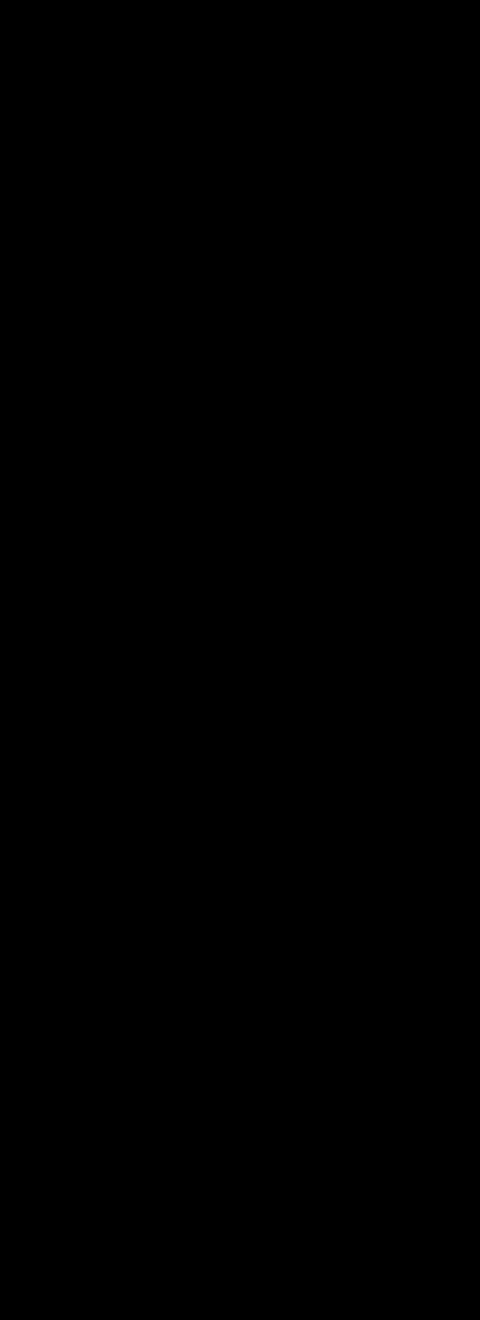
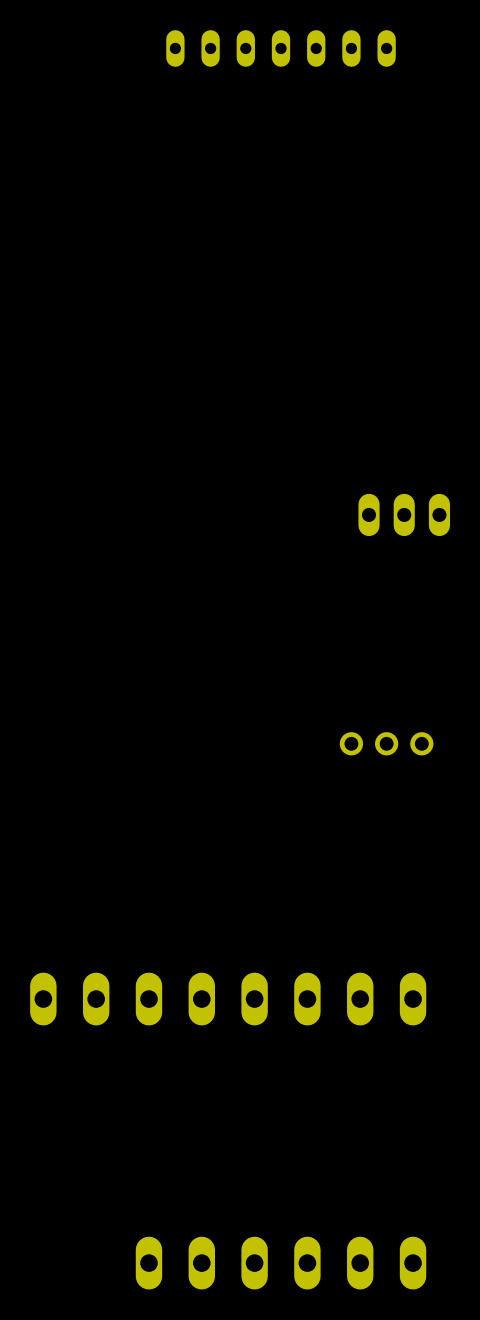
part: none -> (281, 48)
part: none -> (404, 514)
part: none -> (386, 743)
part: none -> (228, 999)
part: none -> (281, 1263)

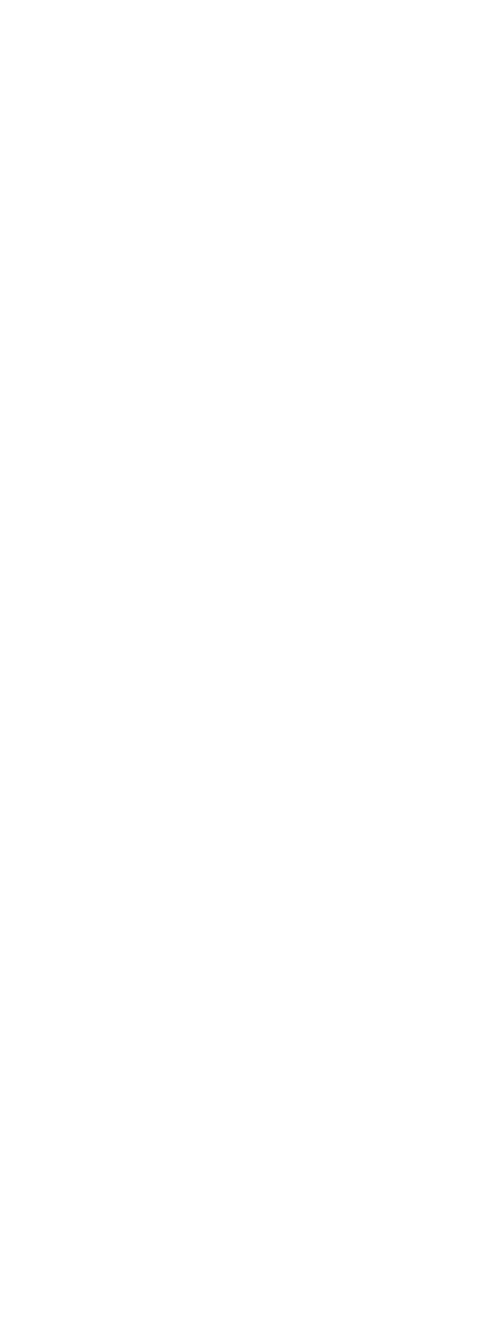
part: (281, 48) -> none
part: (404, 514) -> none
part: (386, 743) -> none
part: (228, 999) -> none
part: (281, 1263) -> none

